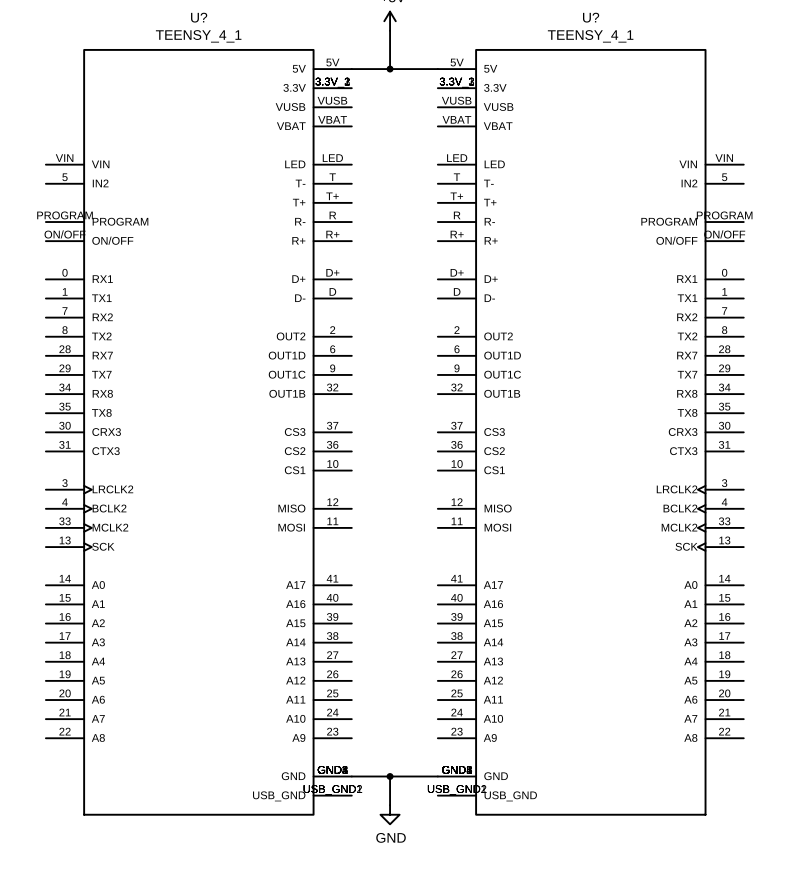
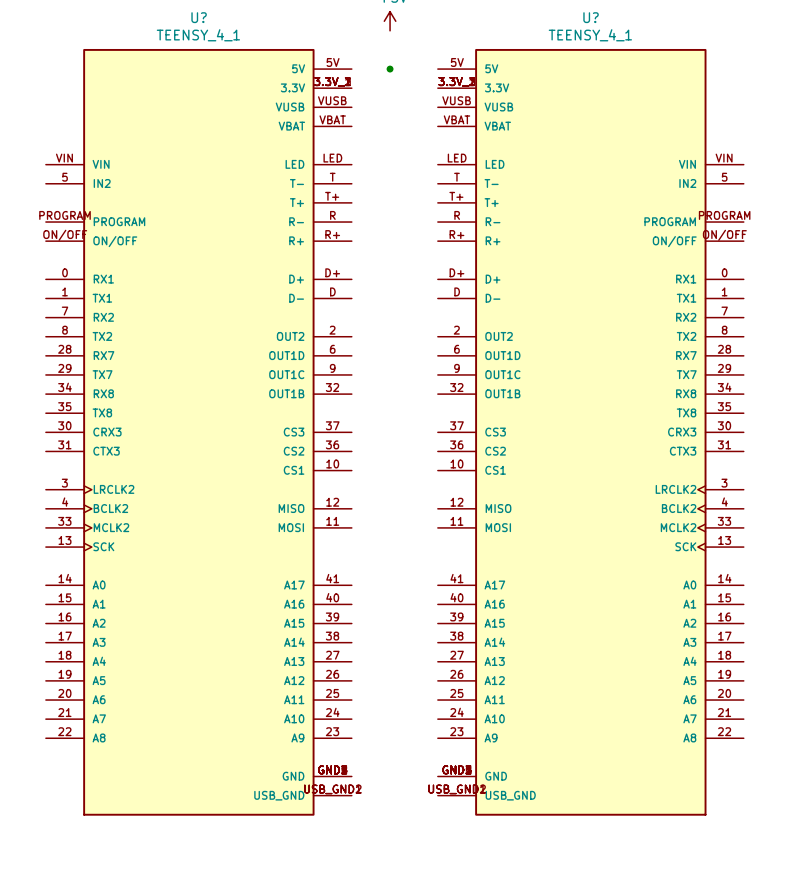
wire: (390, 30) (390, 69) -> none
wire: (351, 69) (437, 69) -> none
wire: (351, 776) (437, 776) -> none
wire: (390, 776) (390, 805) -> none
junction: (390, 776) -> none
power symbol: GND (390, 814) -> none

